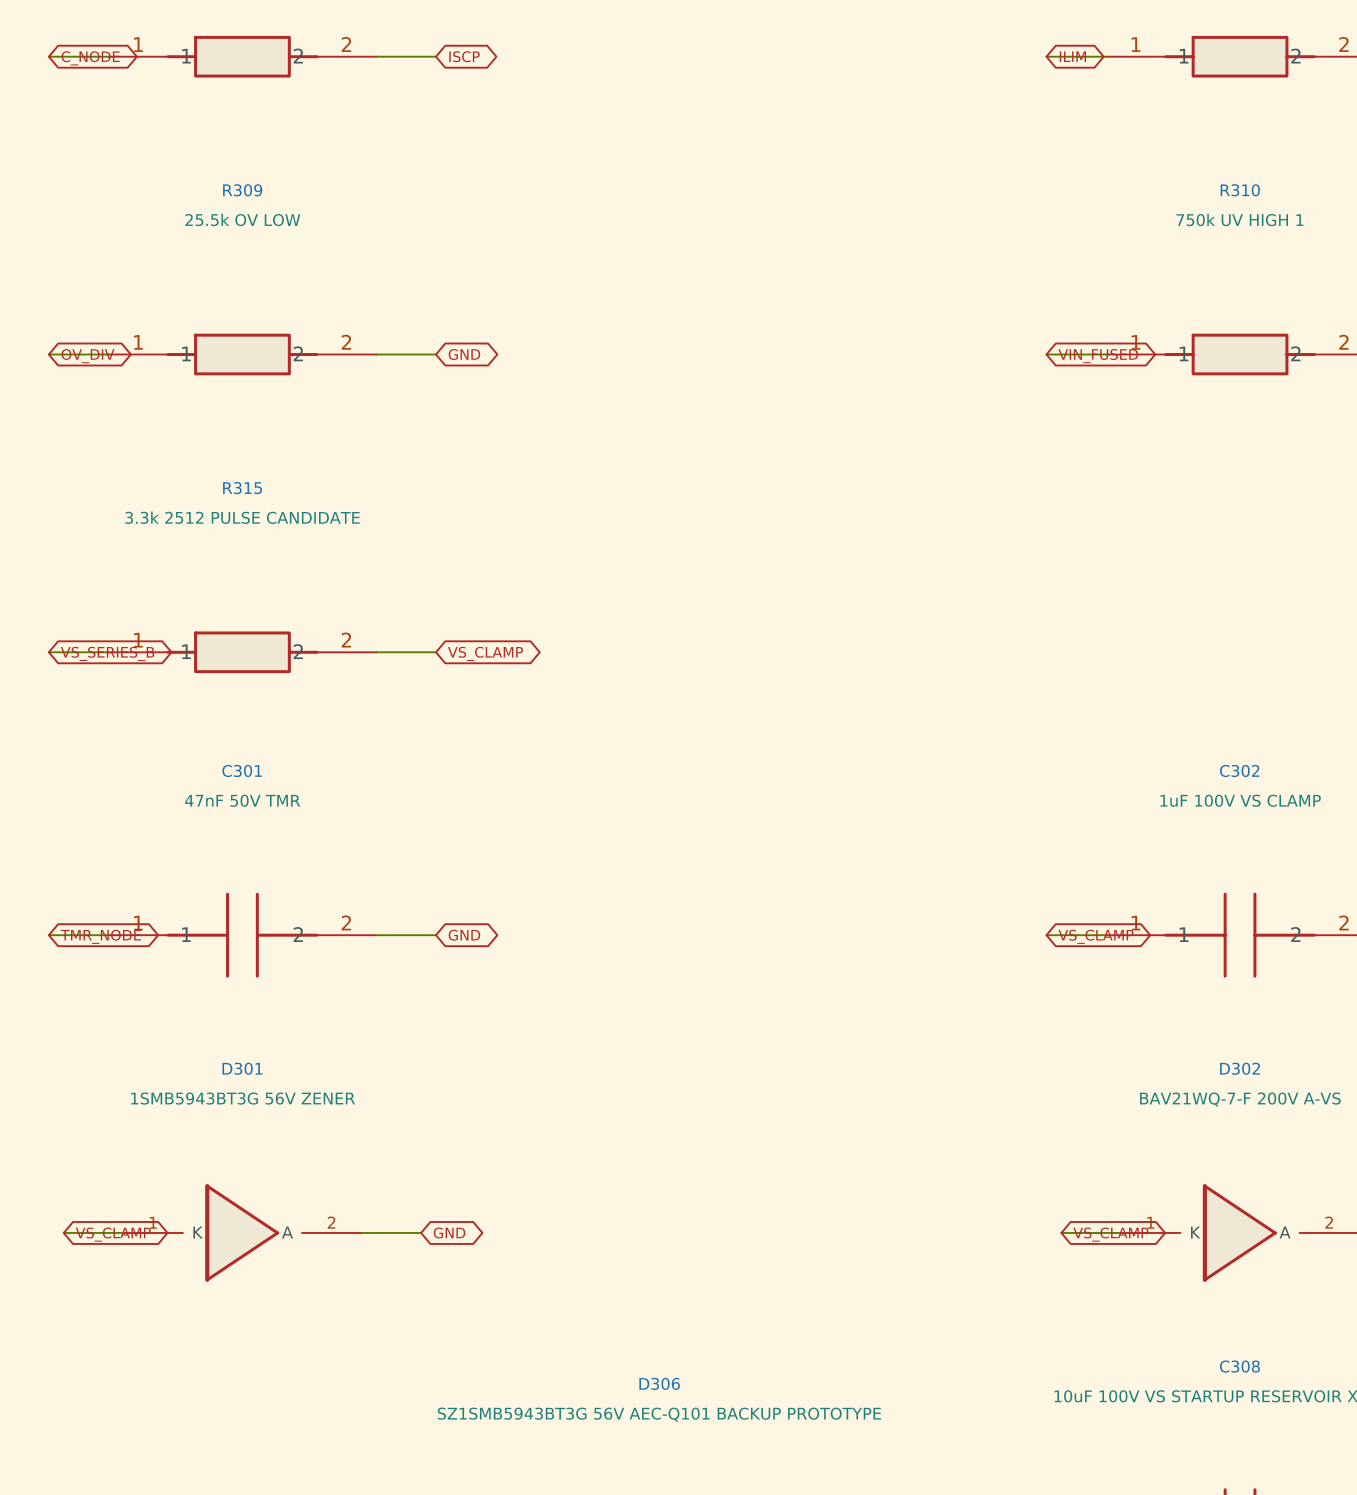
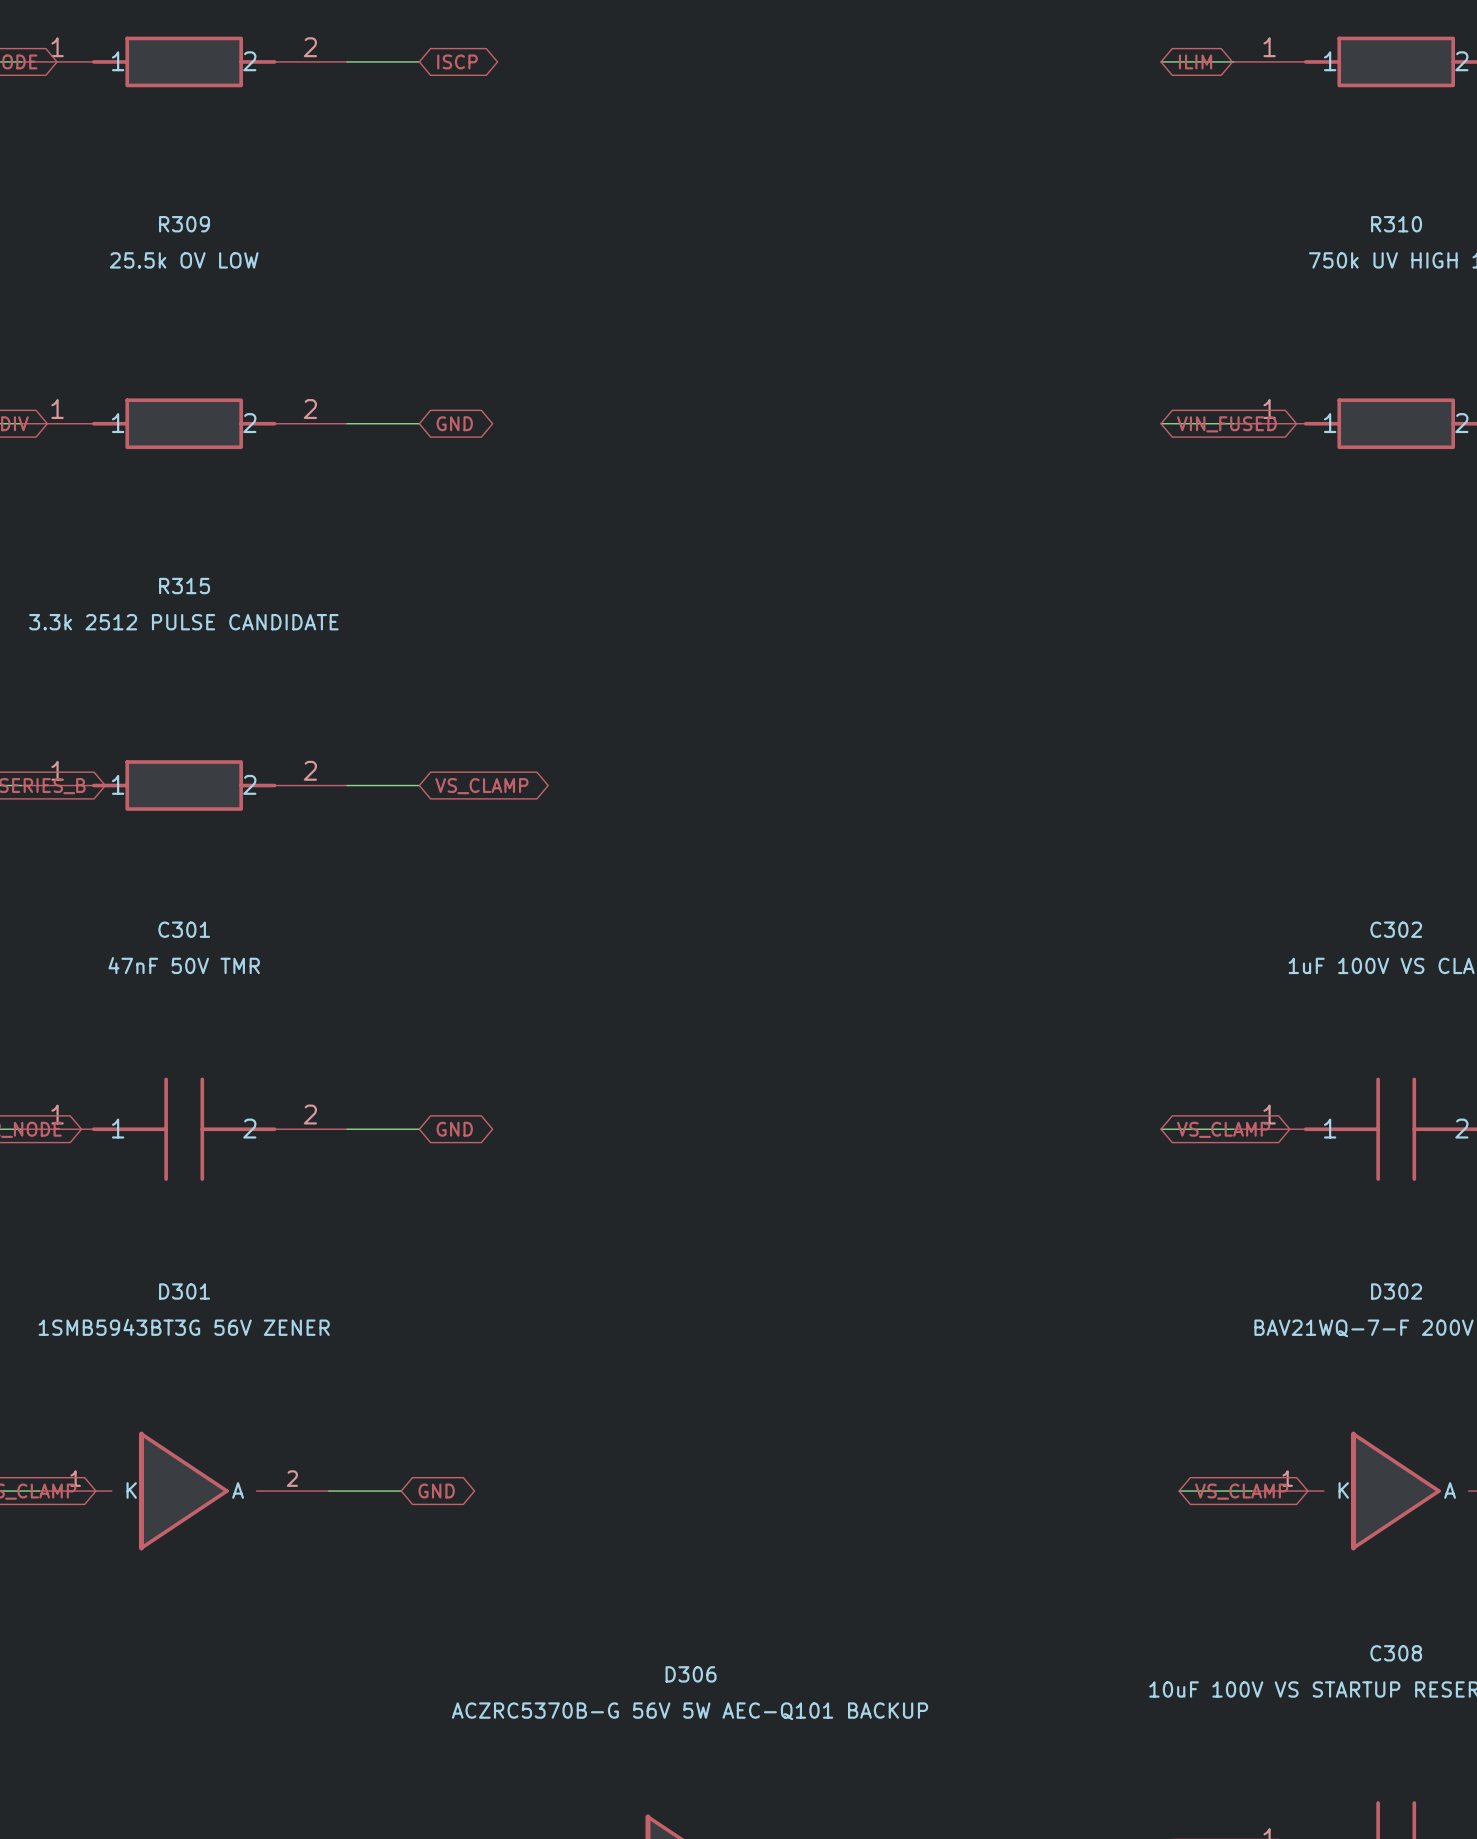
D306 value: SZ1SMB5943BT3G 56V AEC-Q101 BACKUP PROTOTYPE (659, 1414) -> ACZRC5370B-G 56V 5W AEC-Q101 BACKUP (690, 1711)

